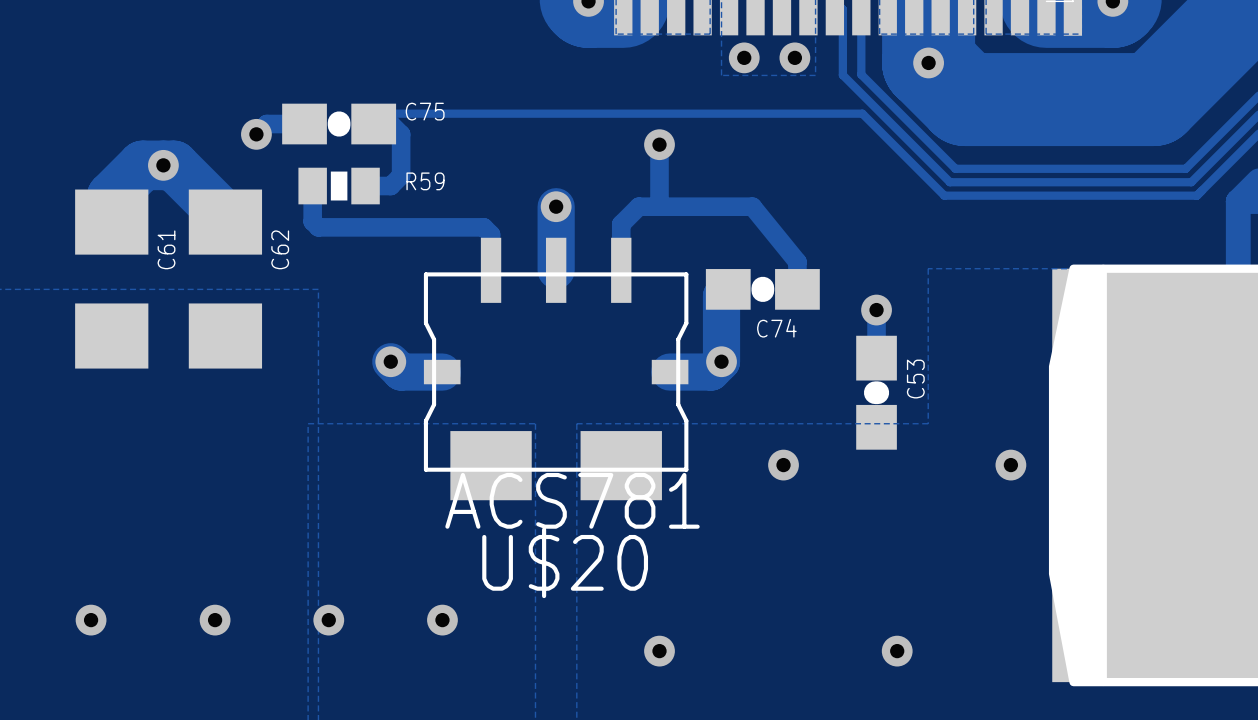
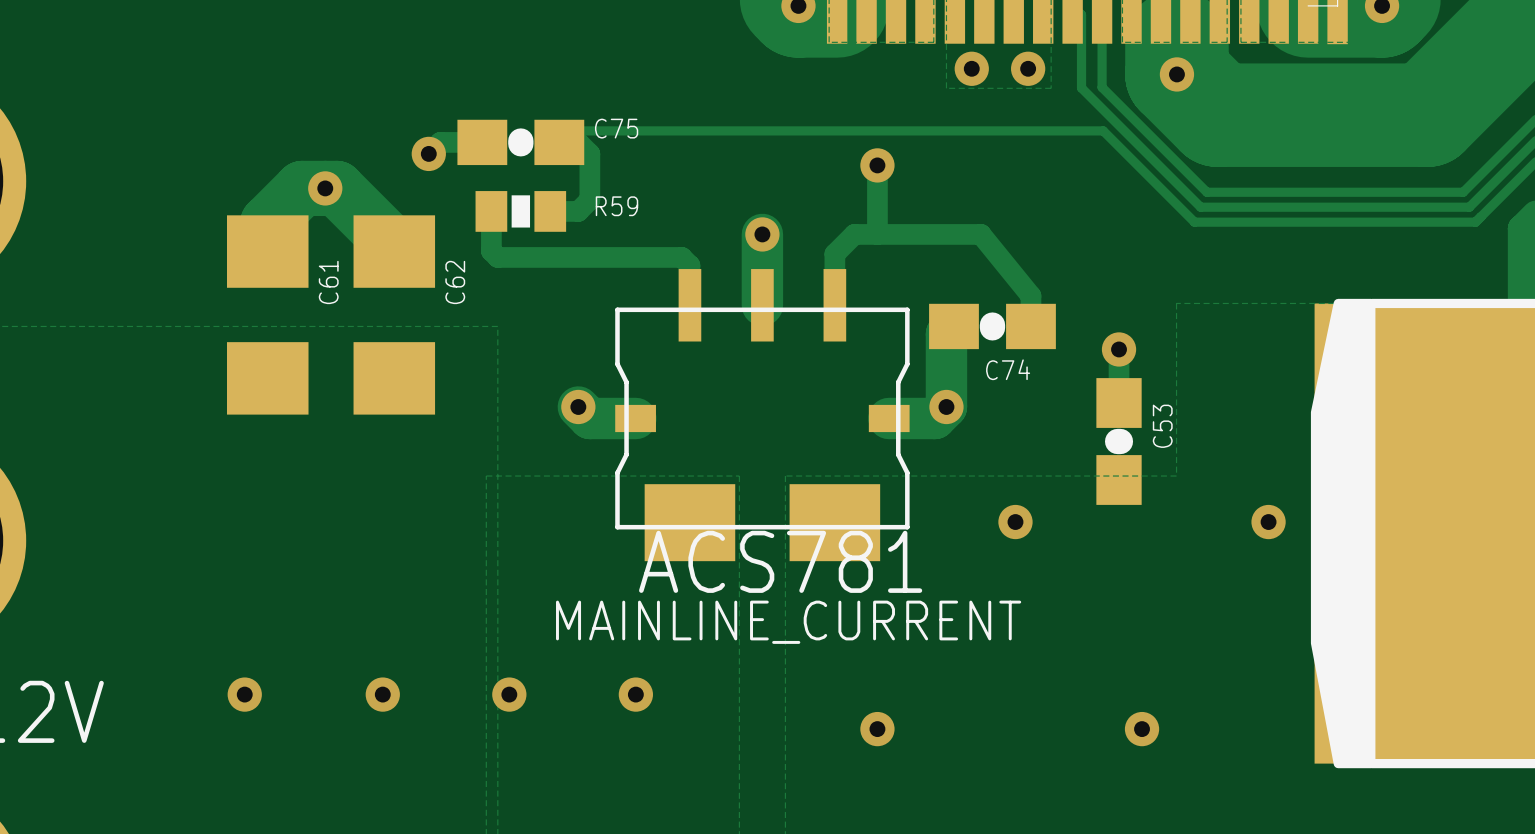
U$20 name: U$20 (565, 562) -> MAINLINE_CURRENT (788, 622)

